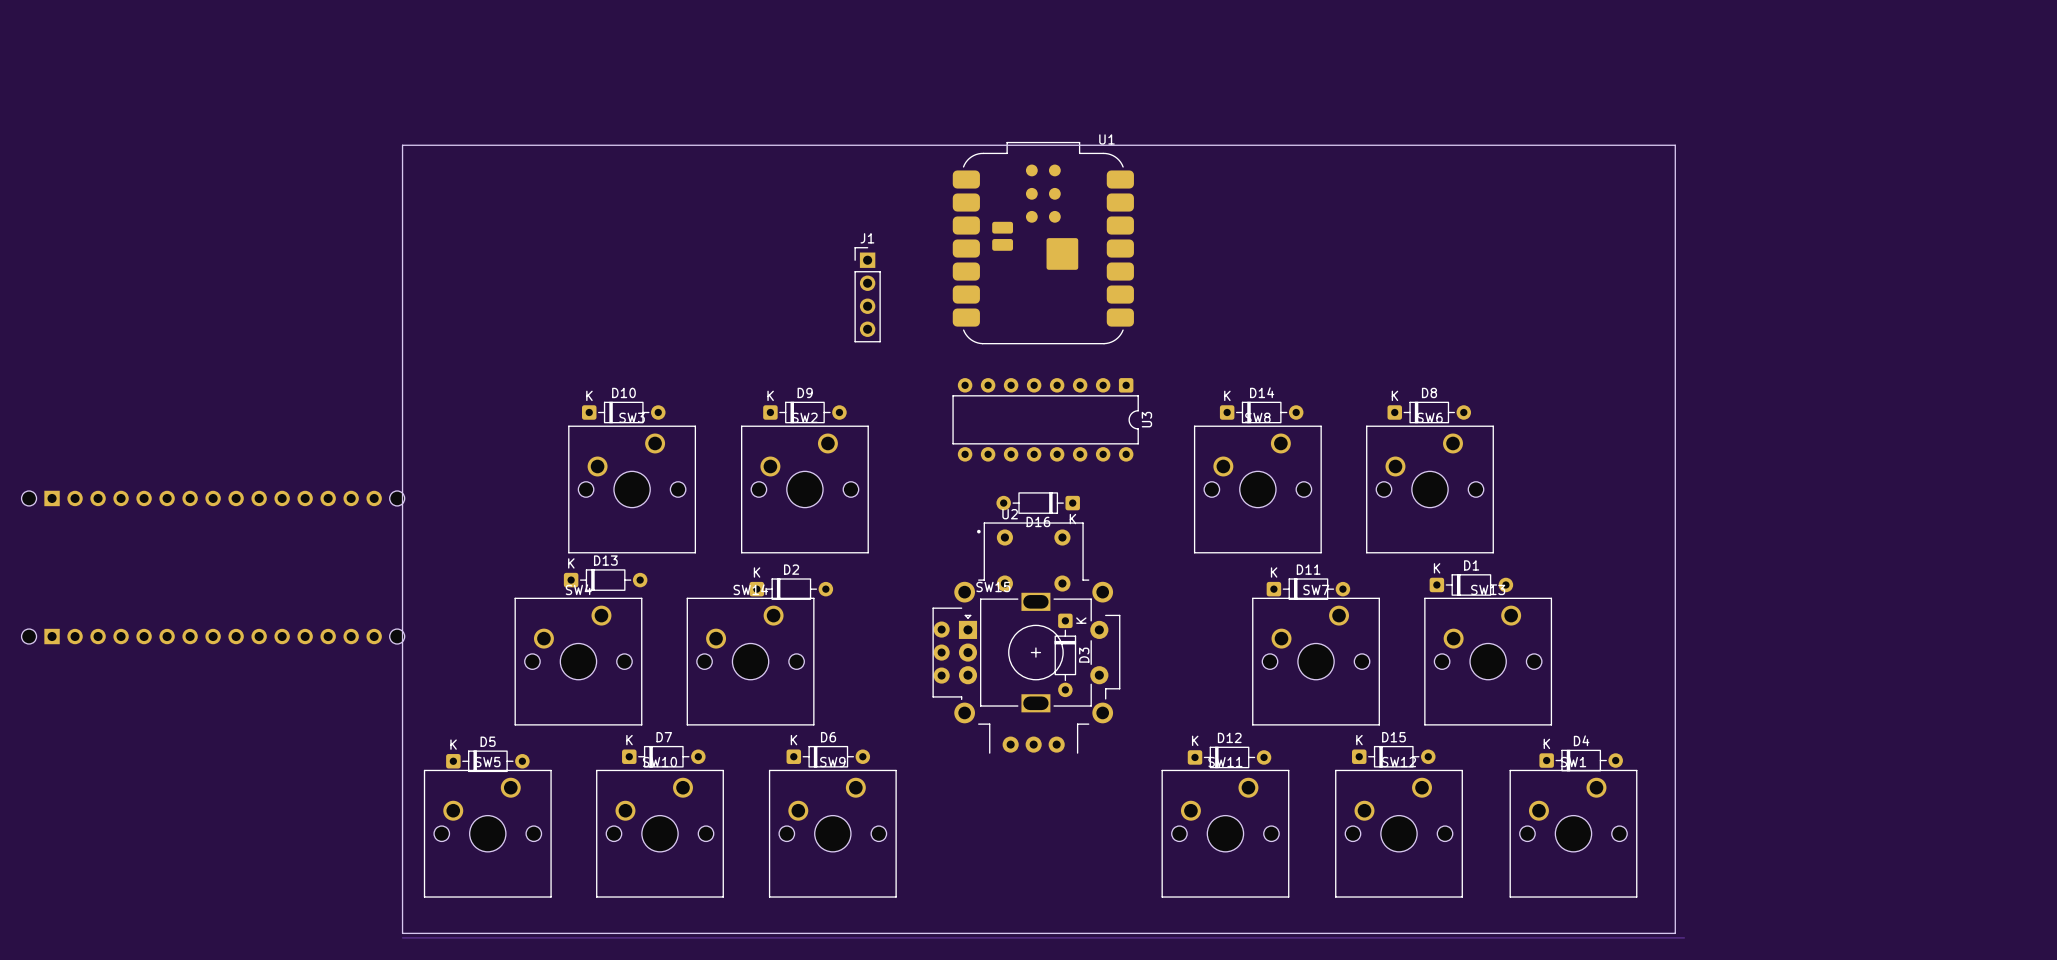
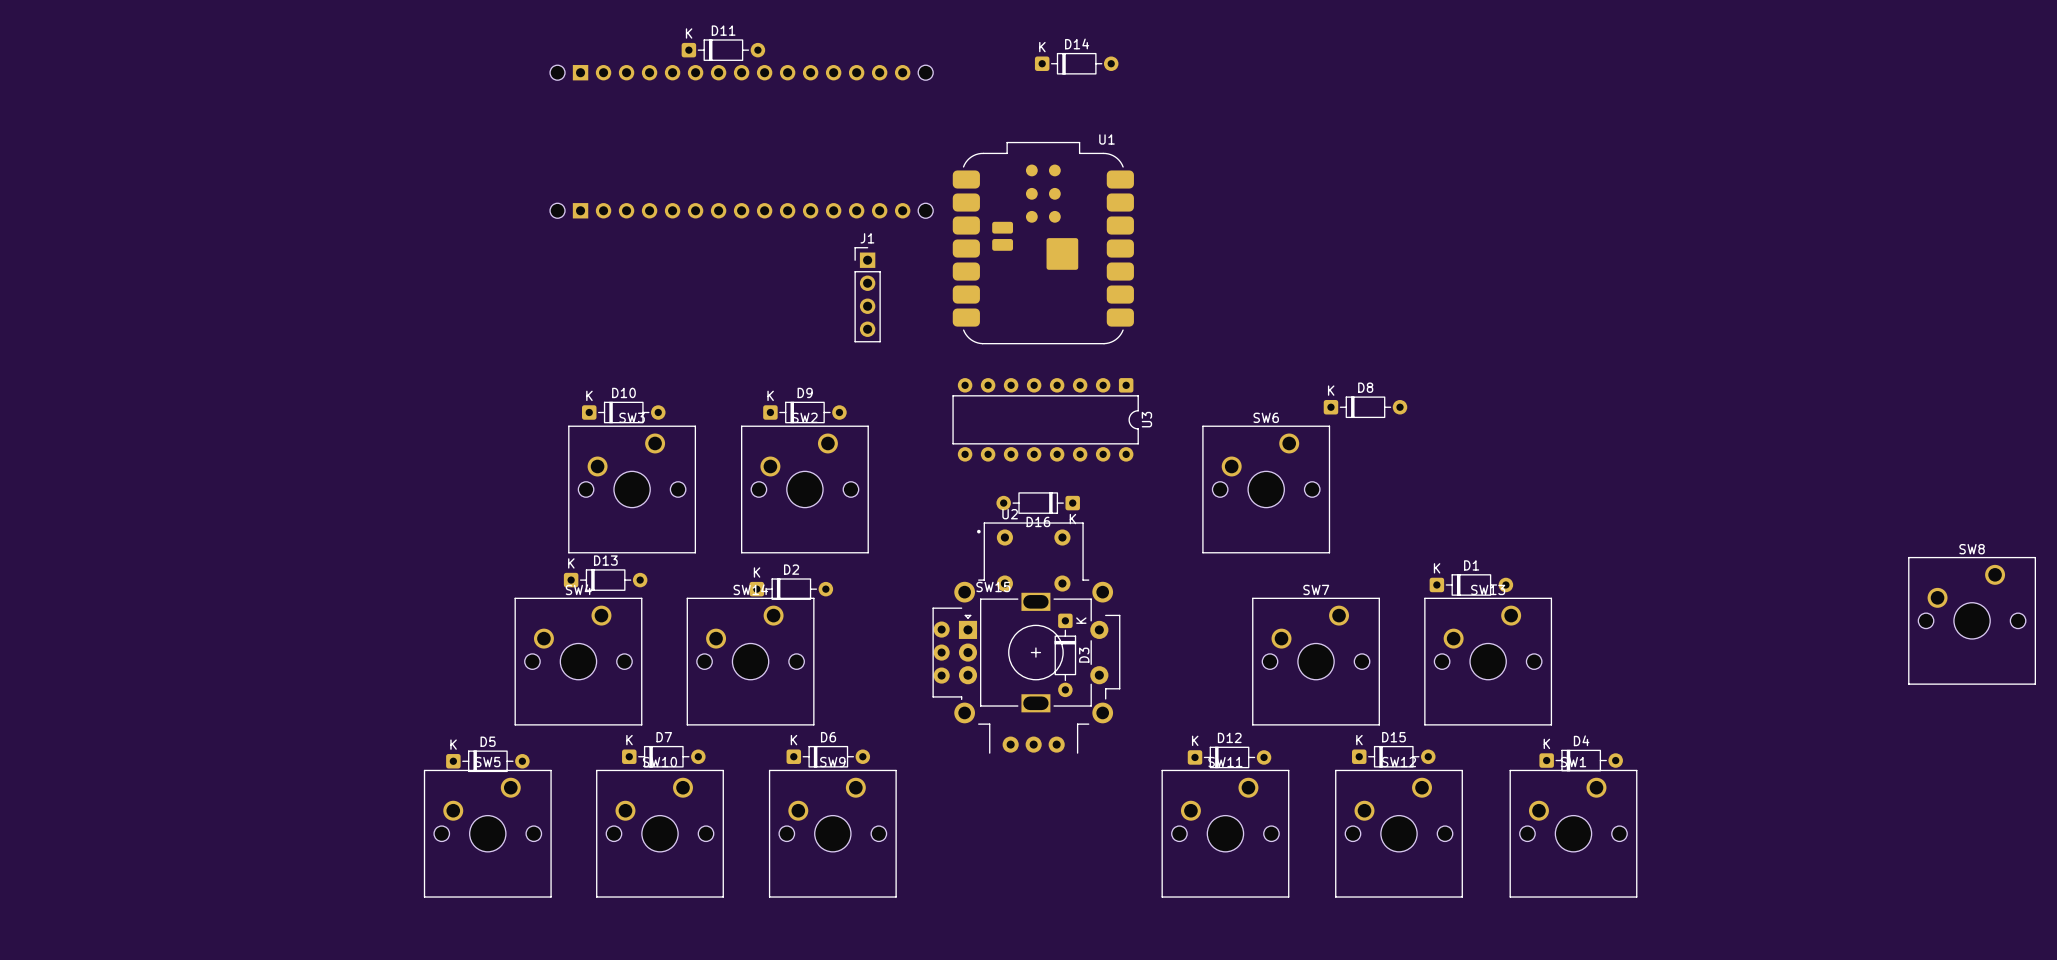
part: none -> (557, 72)
part: none -> (741, 72)
part: none -> (925, 72)
board edge: (402, 145) (1675, 145) (1675, 933) (402, 933) (402, 145) -> none
part: none -> (557, 210)
part: none -> (741, 210)
part: none -> (925, 210)
D14 position: (1261, 412) -> (1076, 63)
D8 position: (1429, 412) -> (1365, 407)
SW8 position: (1257, 489) -> (1972, 620)
SW6 position: (1429, 489) -> (1266, 489)
part: (29, 498) -> none
part: (213, 498) -> none
part: (397, 498) -> none
D11 position: (1308, 589) -> (723, 50)
part: (29, 636) -> none
part: (213, 636) -> none
part: (397, 636) -> none
track: (402, 937) (1684, 937) -> none

